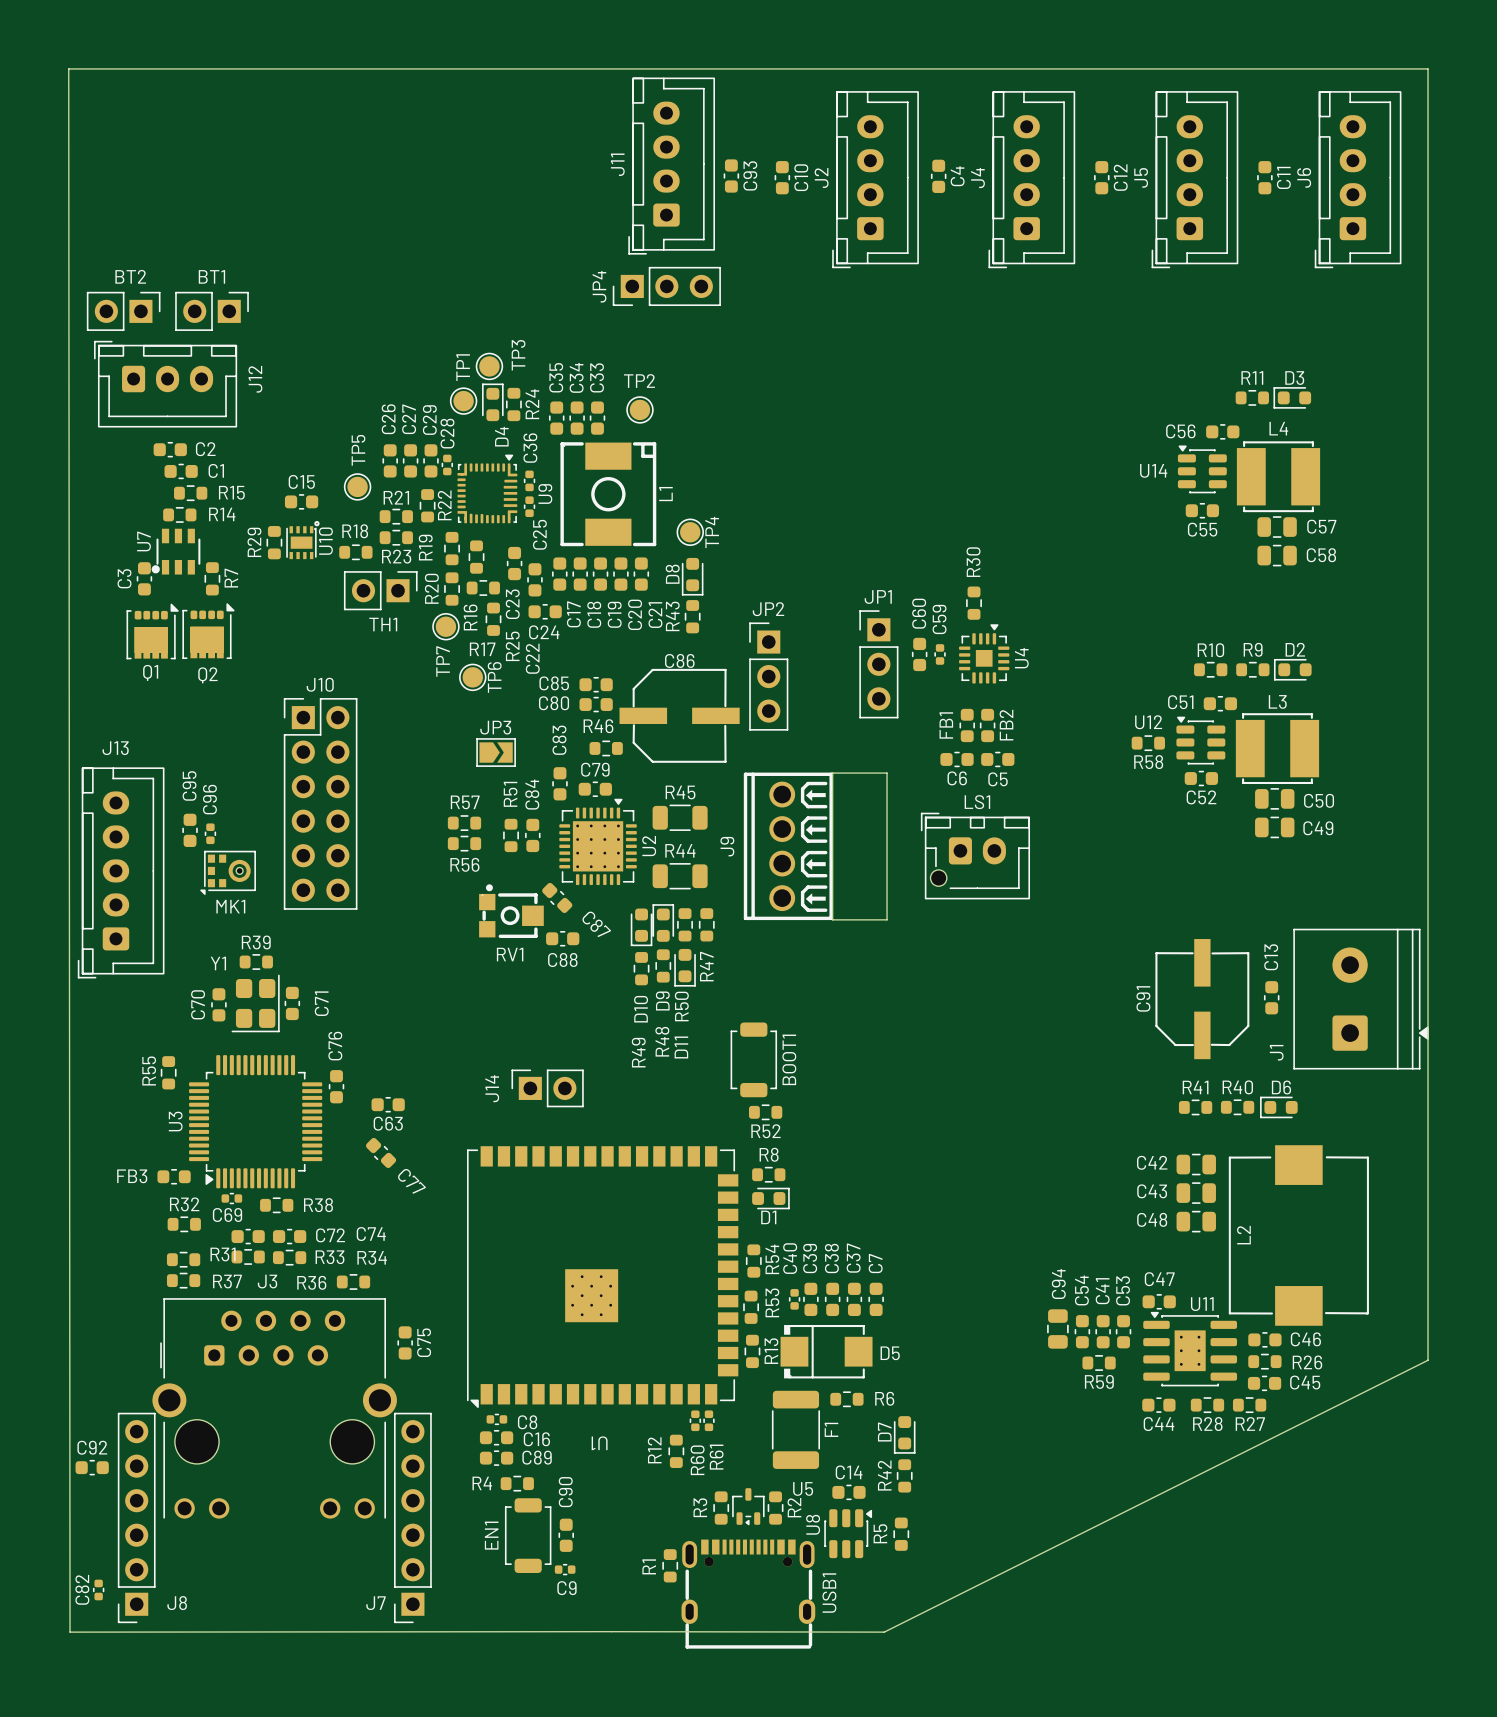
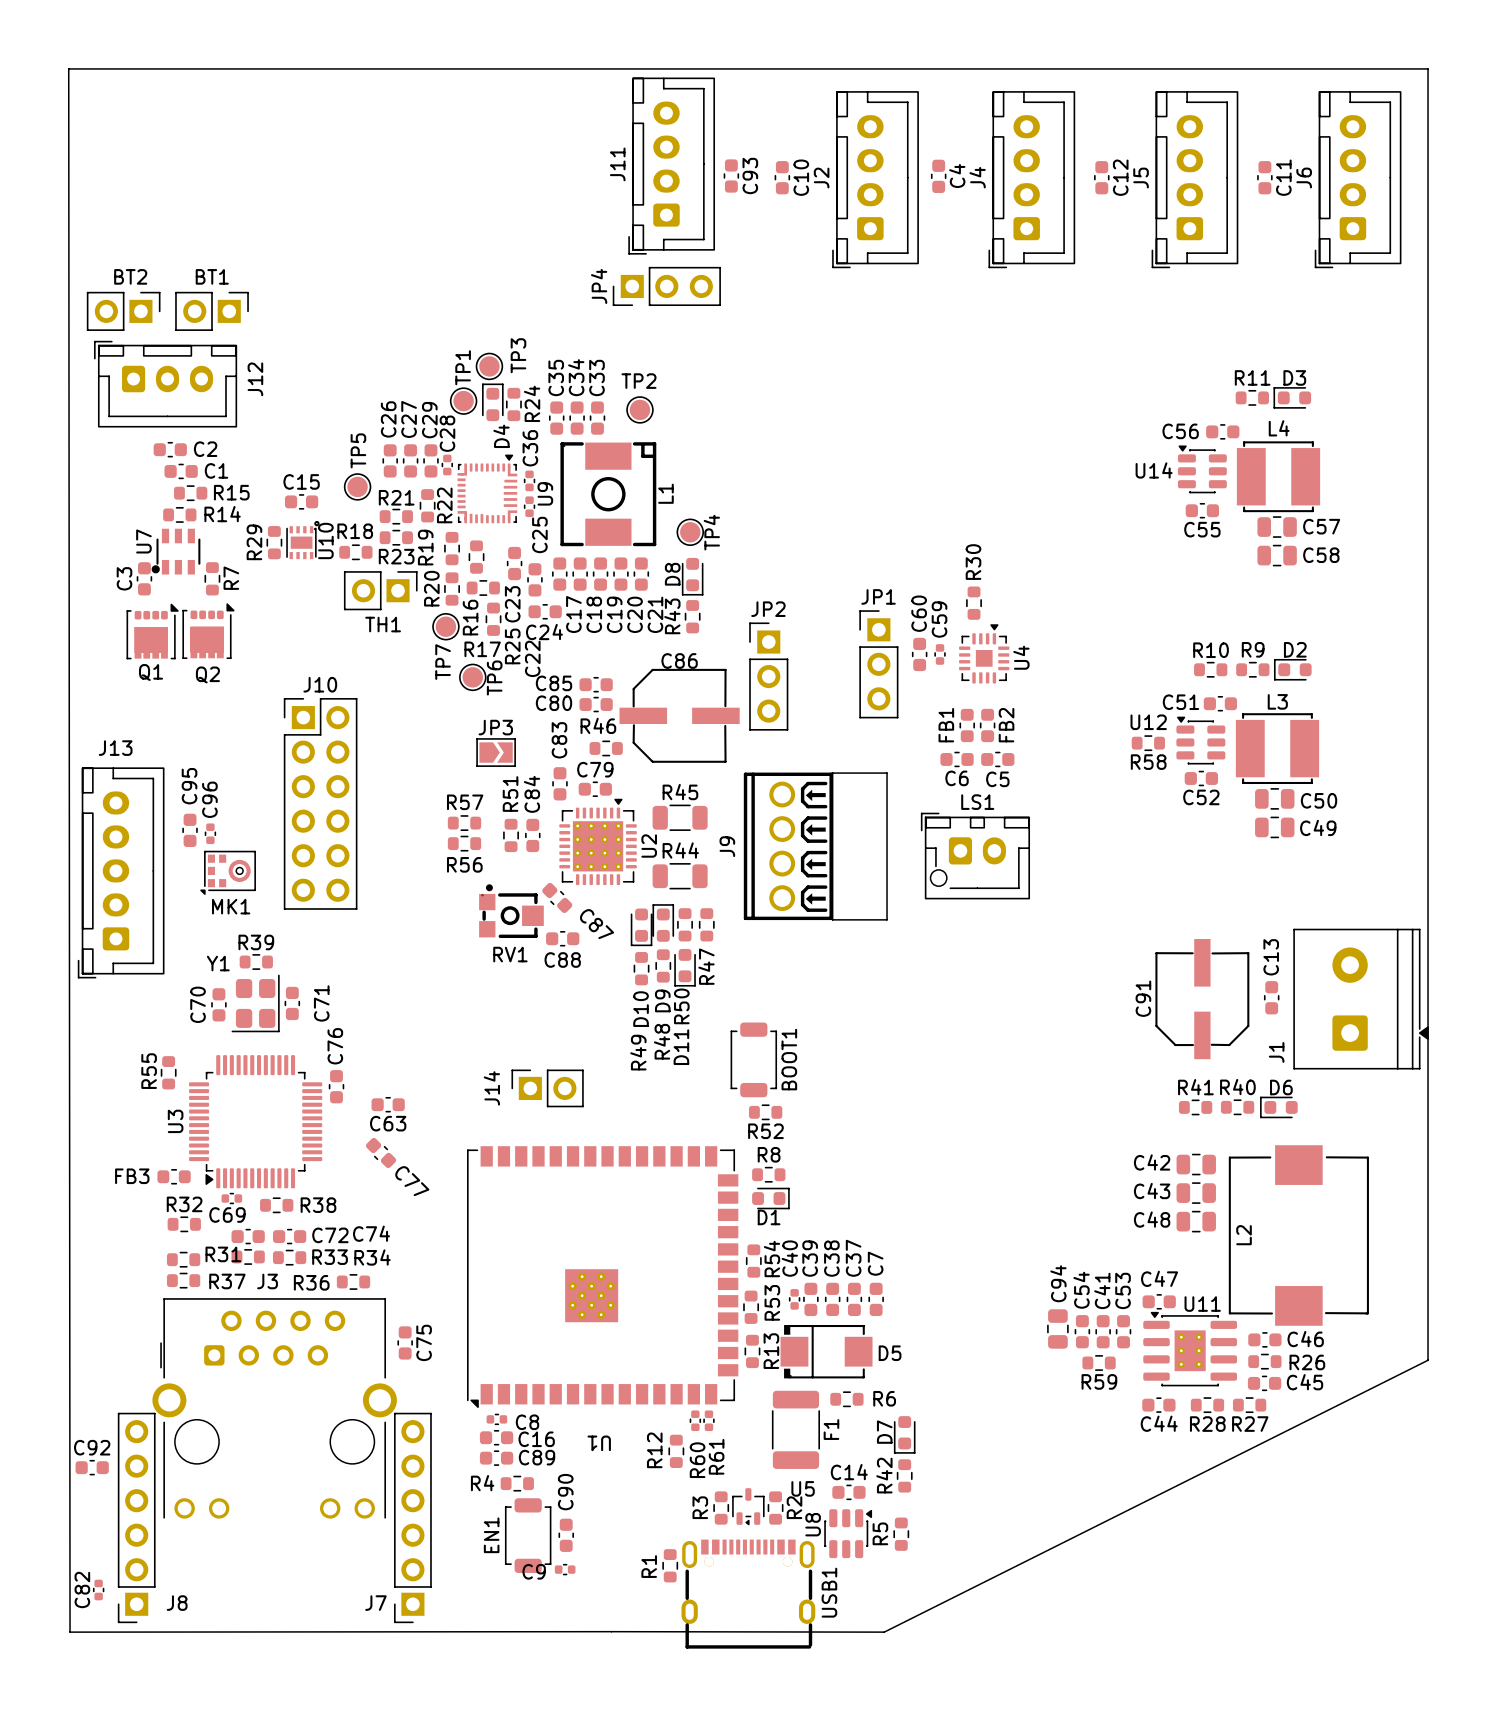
C9 name position: C9 (566, 1588) -> C9 (534, 1571)

